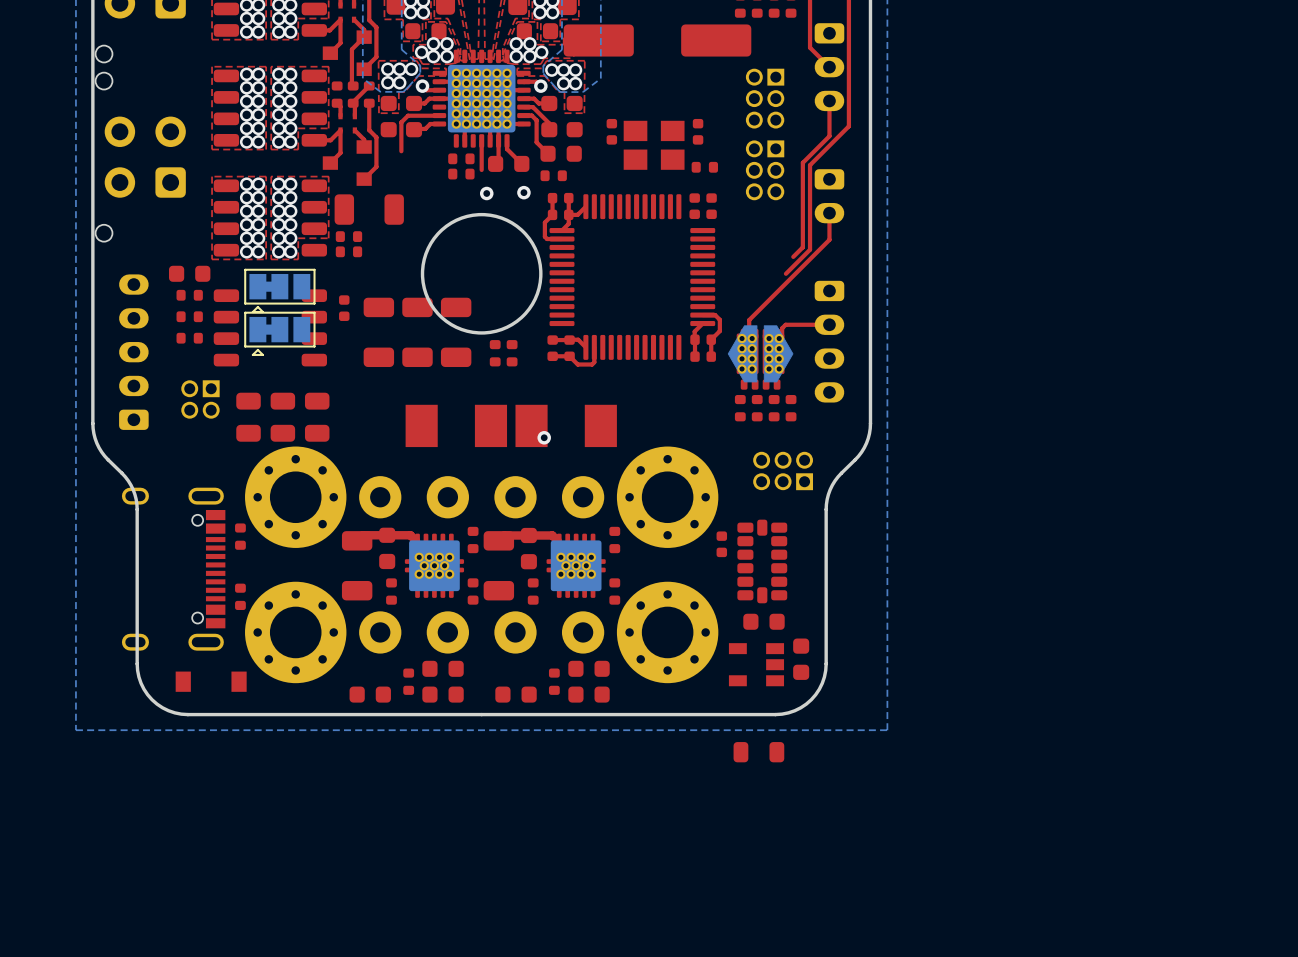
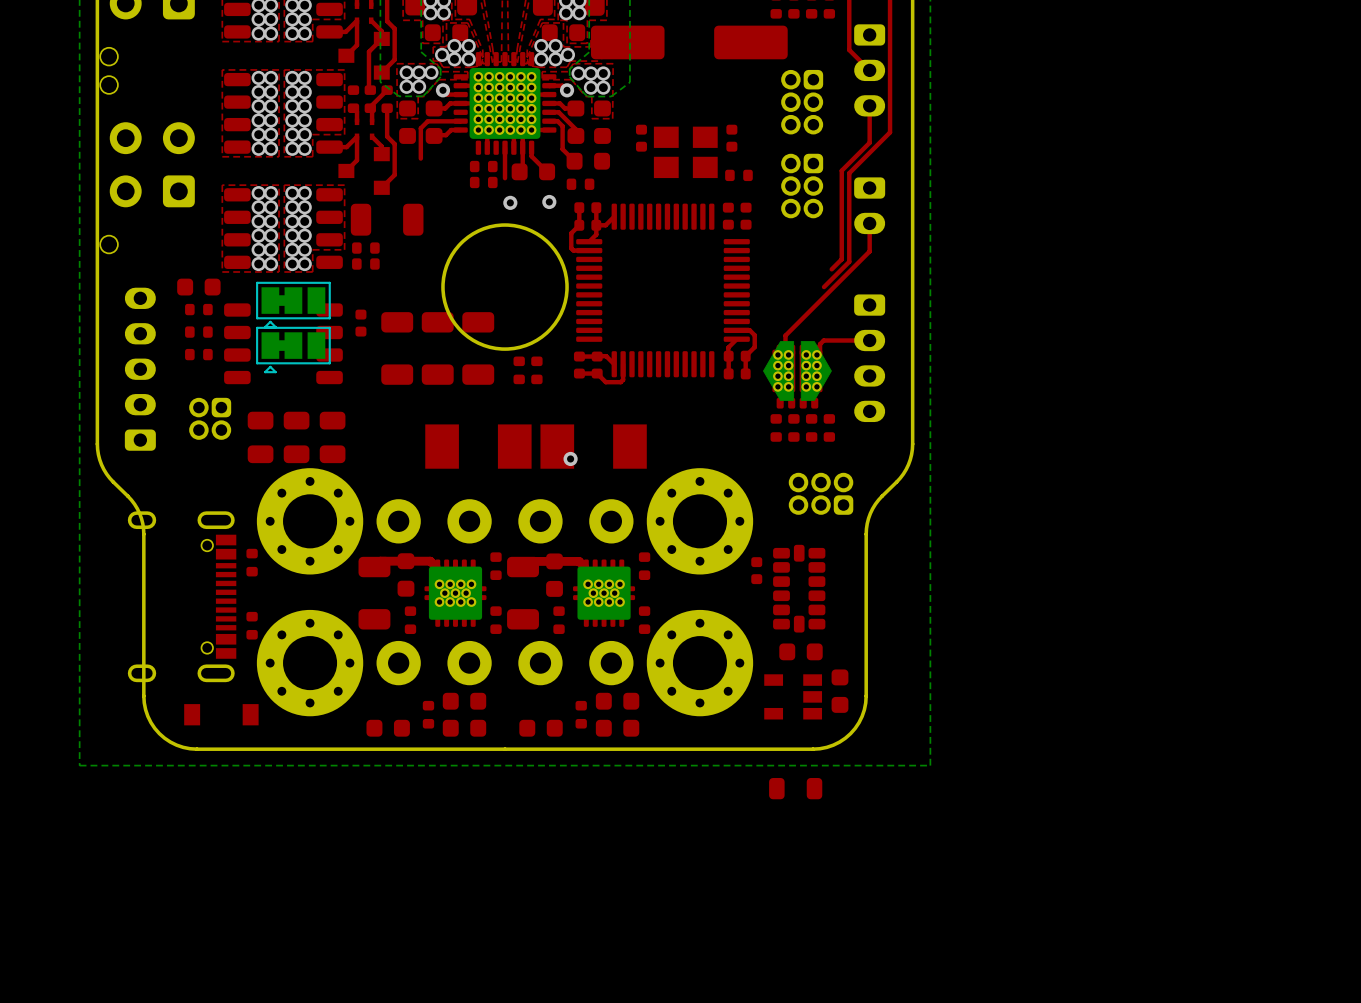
part footprint: [745, 68, 785, 129] -> [781, 69, 824, 135]
part footprint: [745, 140, 785, 201] -> [781, 153, 824, 219]
part footprint: [181, 380, 220, 419] -> [189, 397, 232, 440]
part footprint: [753, 451, 814, 491] -> [788, 472, 854, 515]

